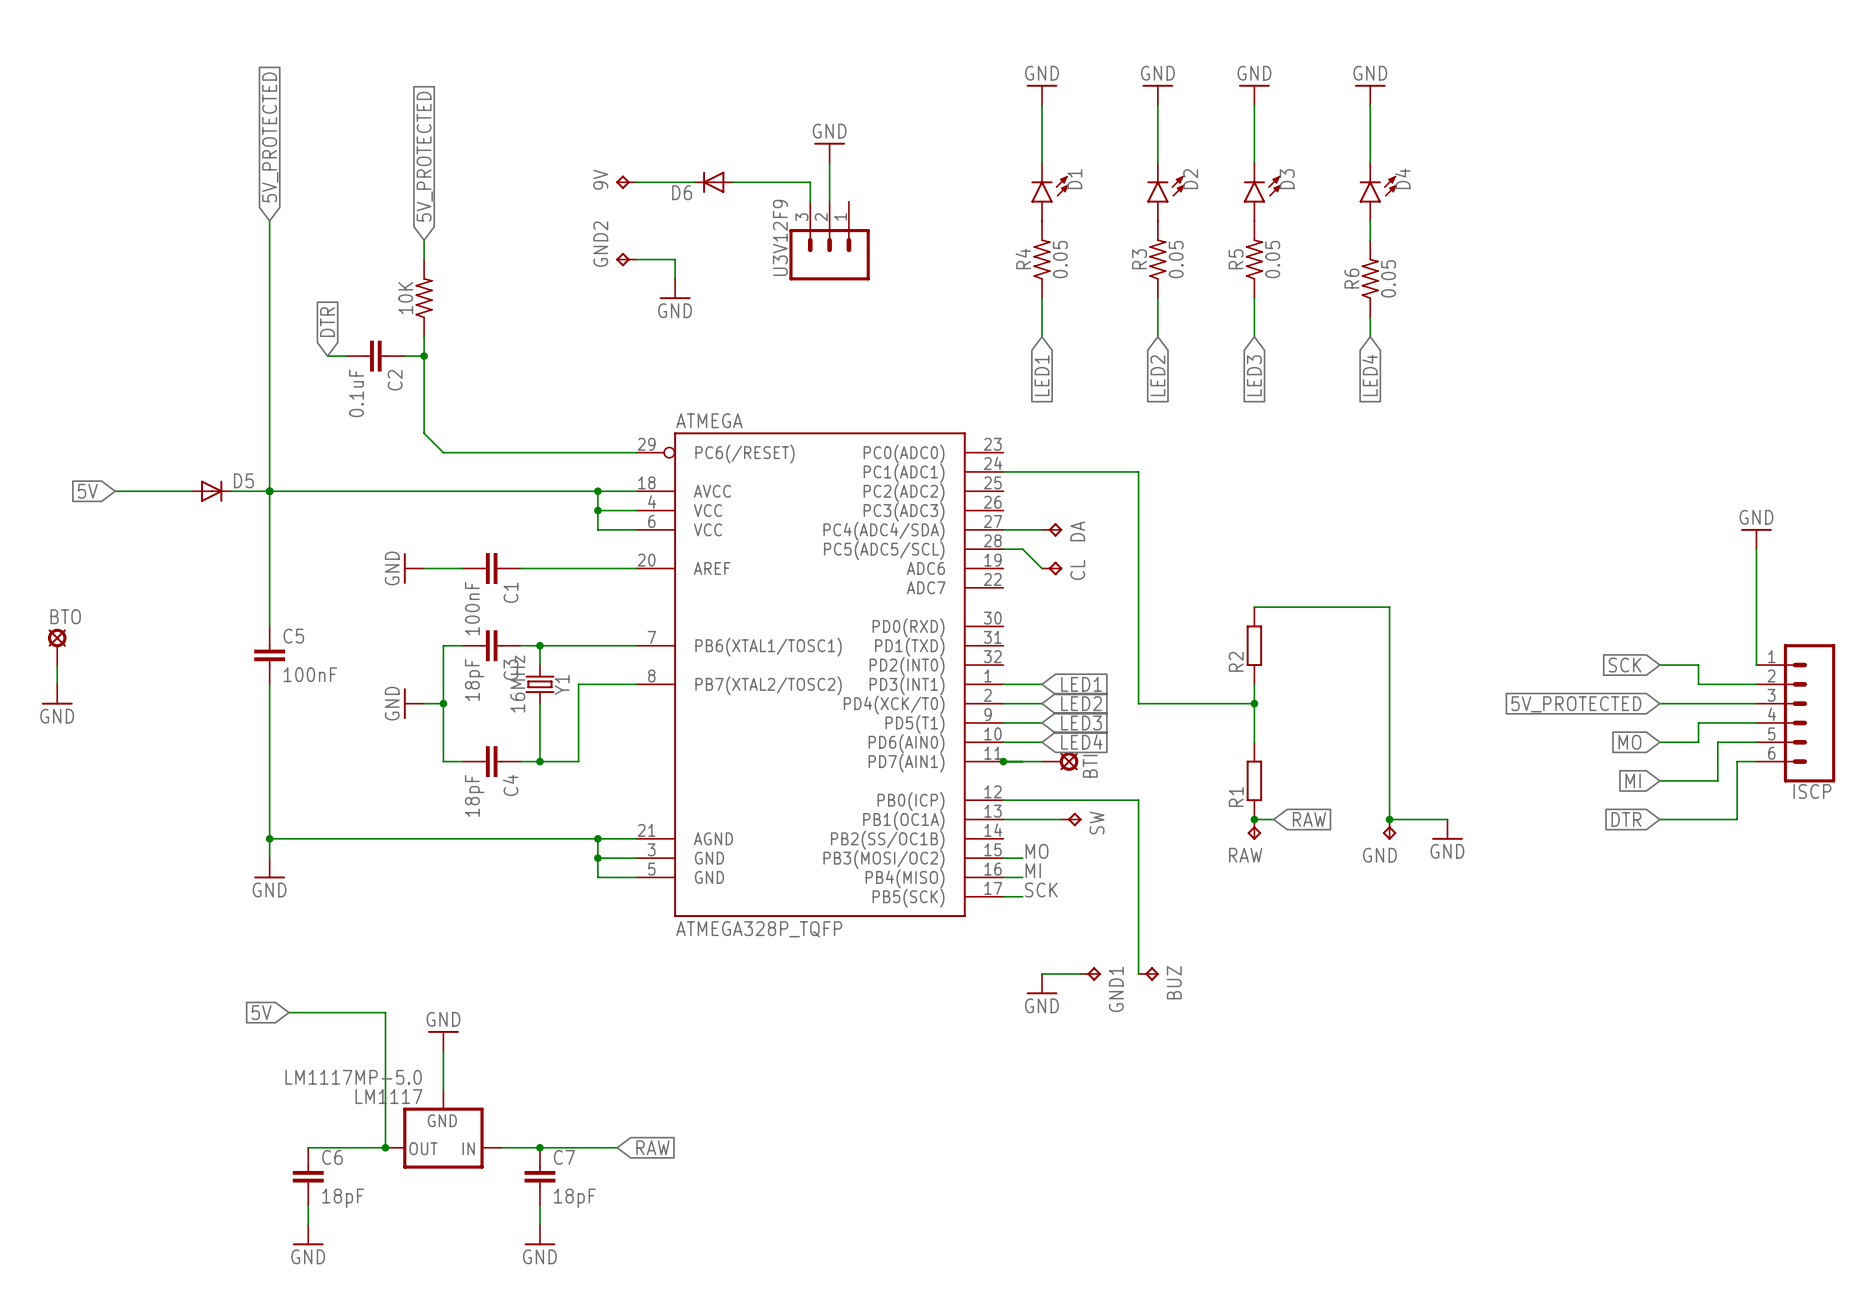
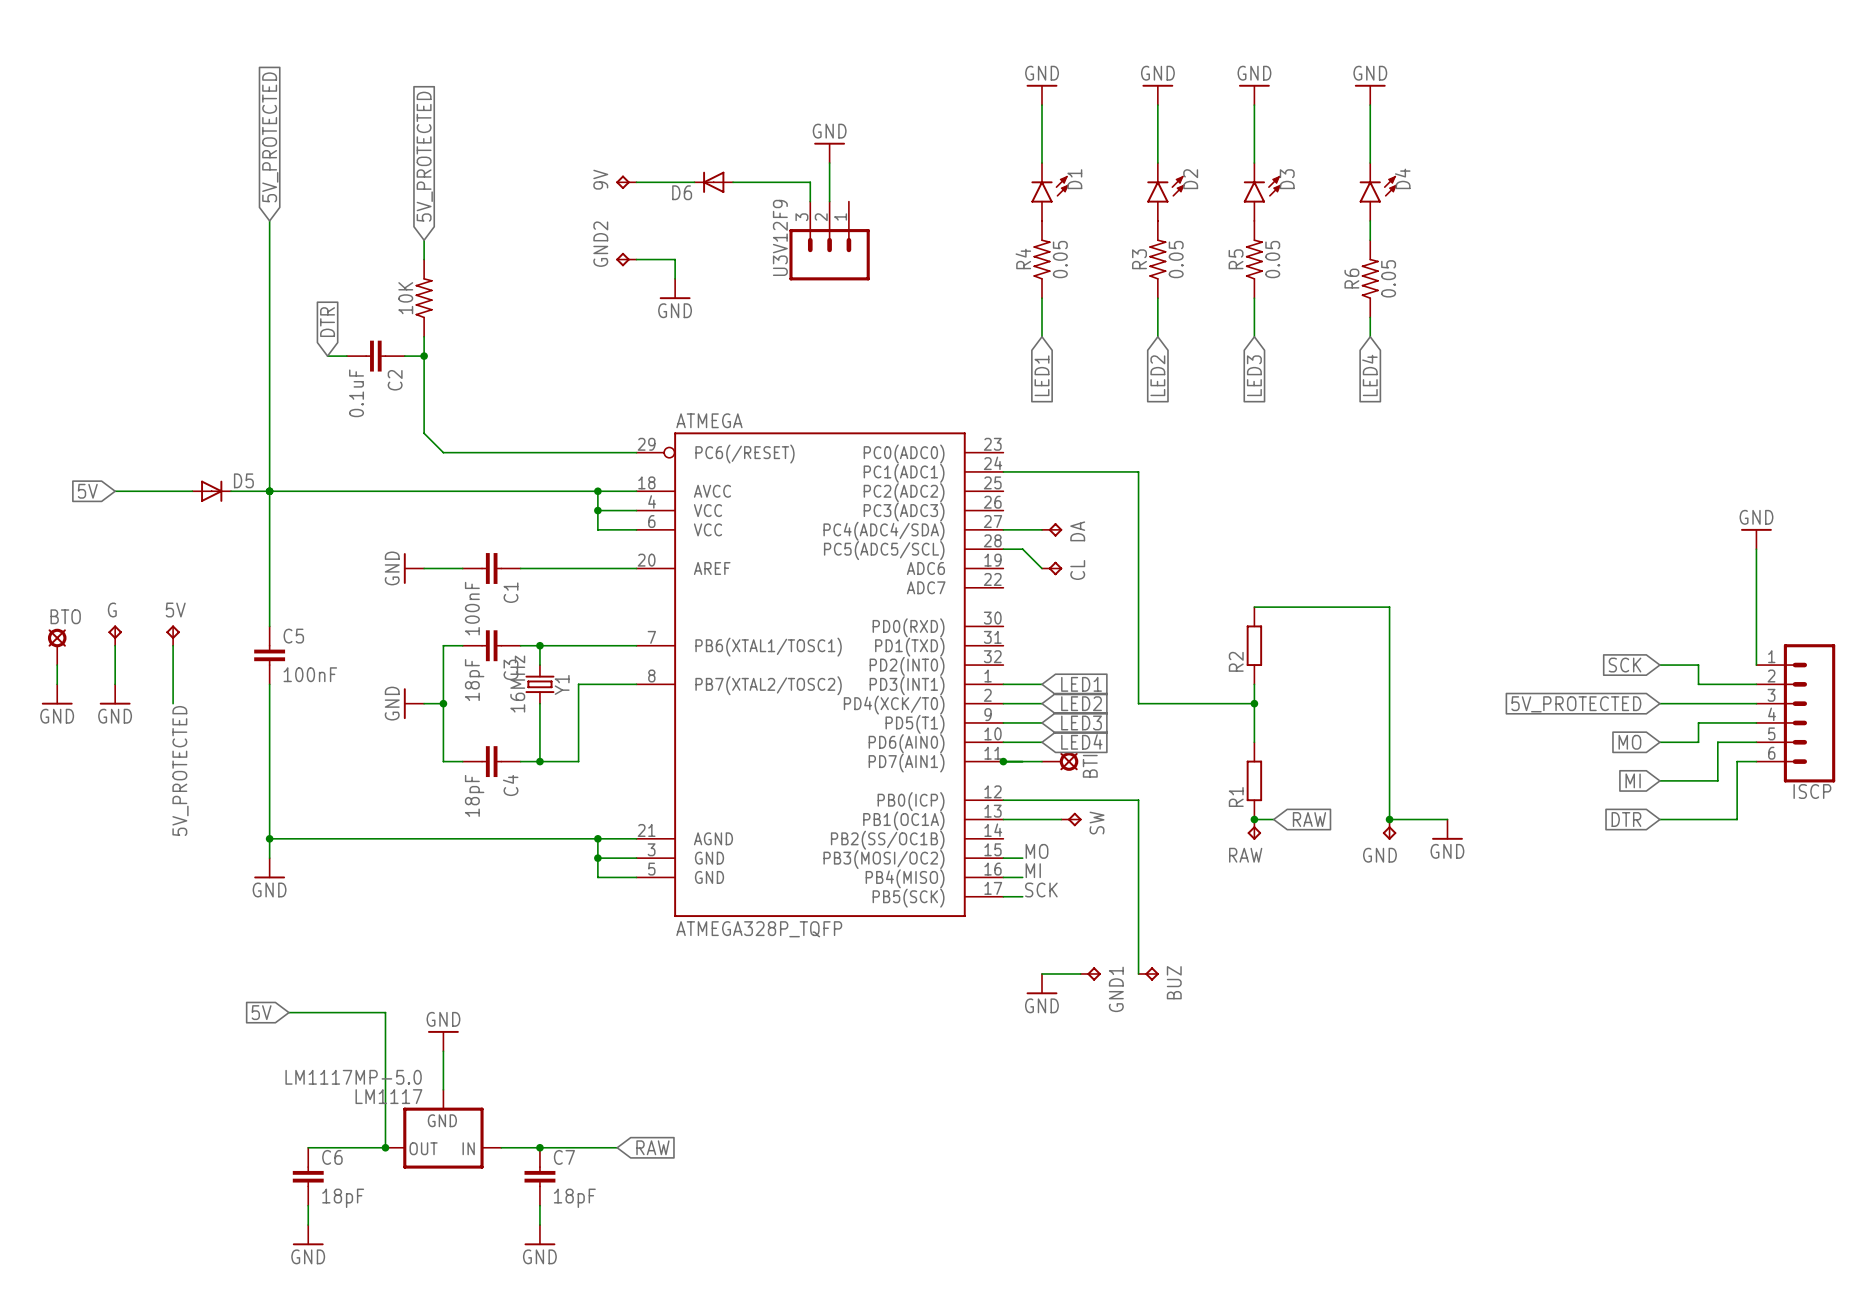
G: none -> (115, 635)
5V: none -> (173, 635)
wire: none -> (115, 645) (115, 684)
wire: none -> (173, 645) (173, 703)
power symbol: none -> GND (115, 694)
label: none -> 5V_PROTECTED (180, 770)

